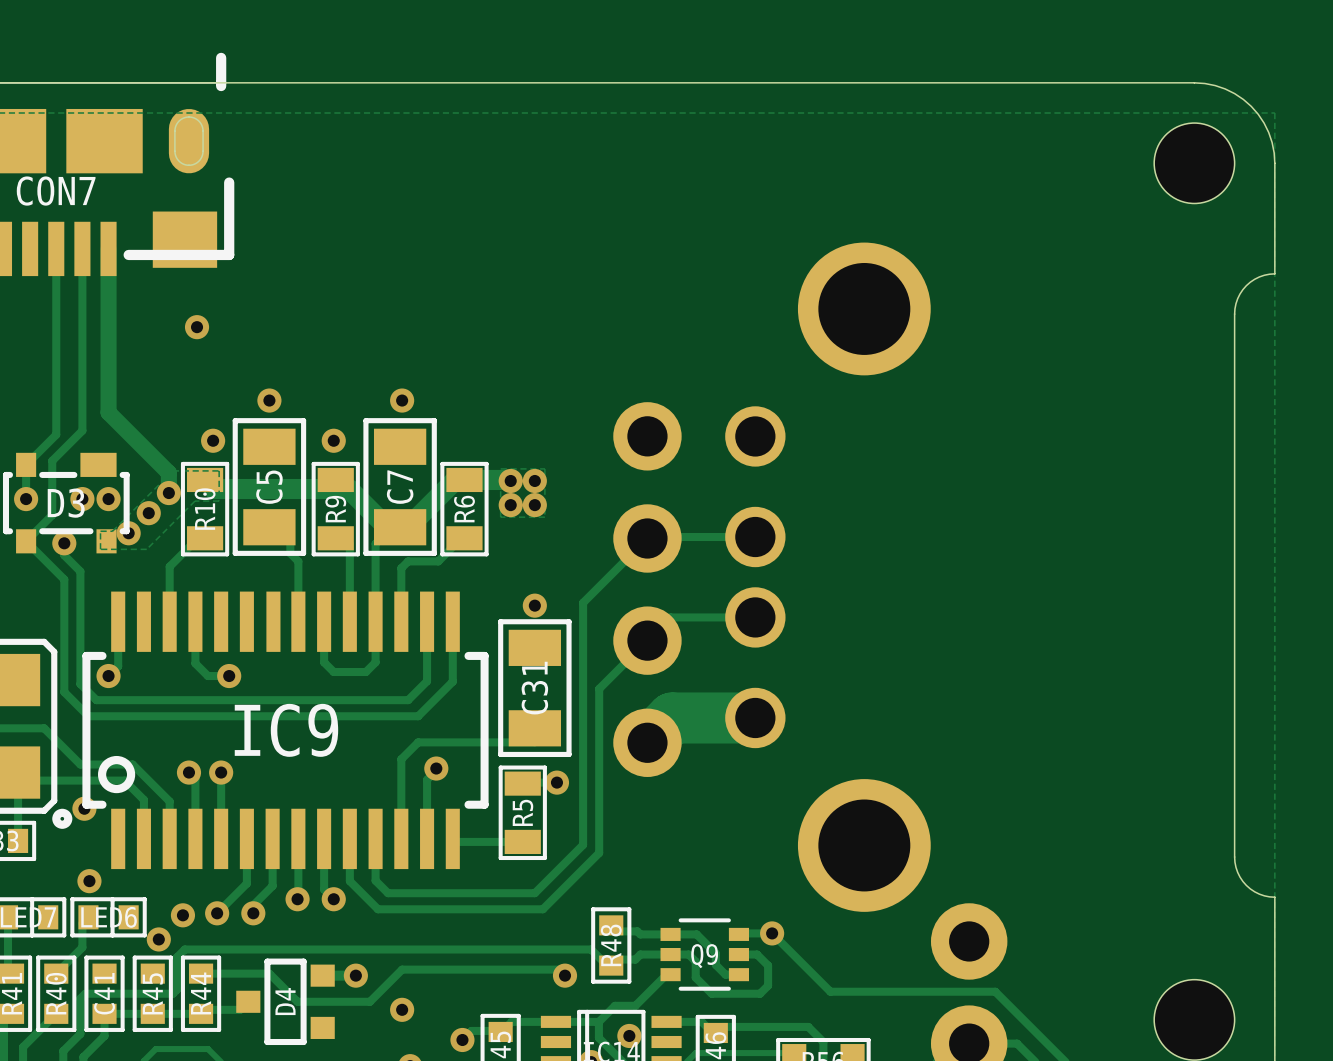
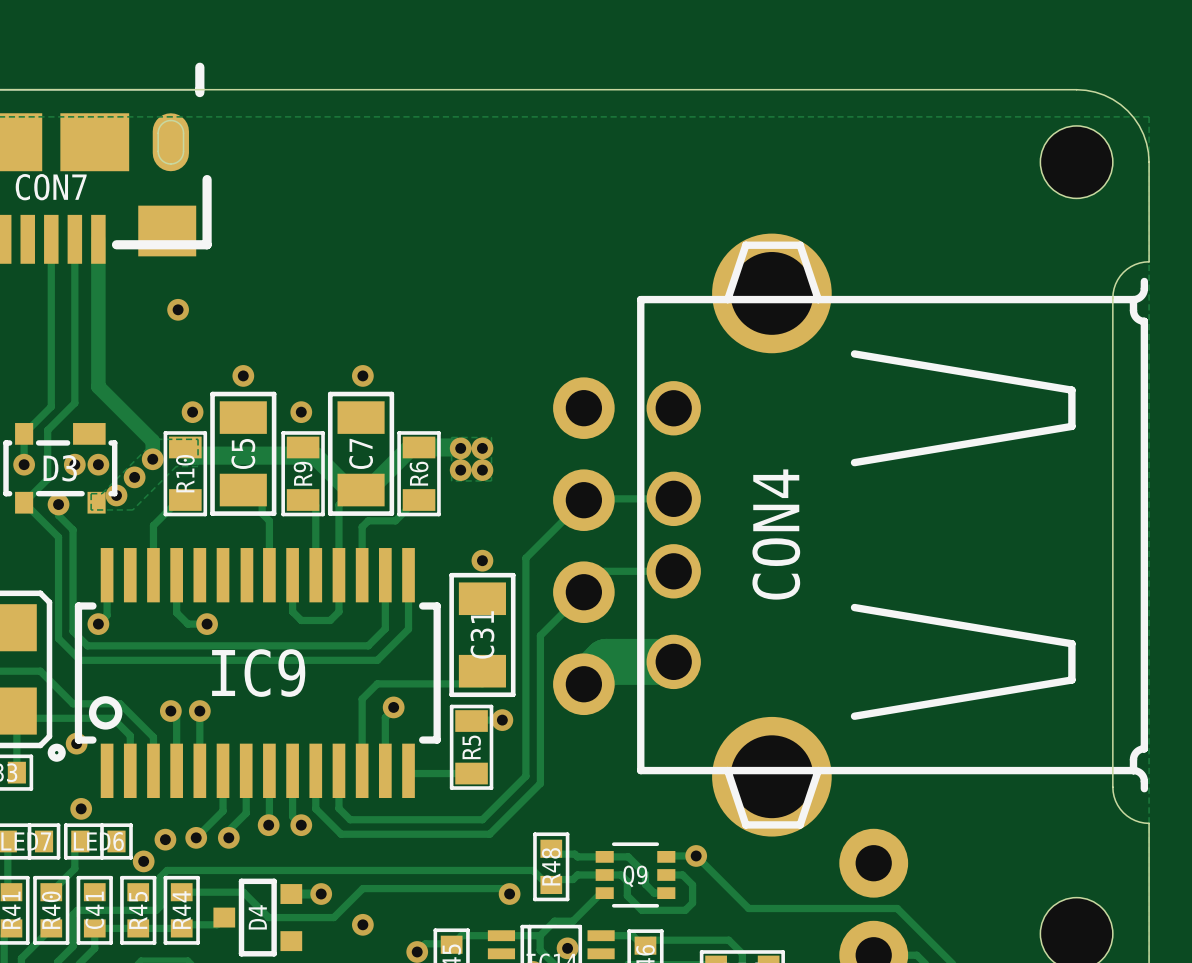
CON4 side: bottom (827, 577) -> top (892, 535)

